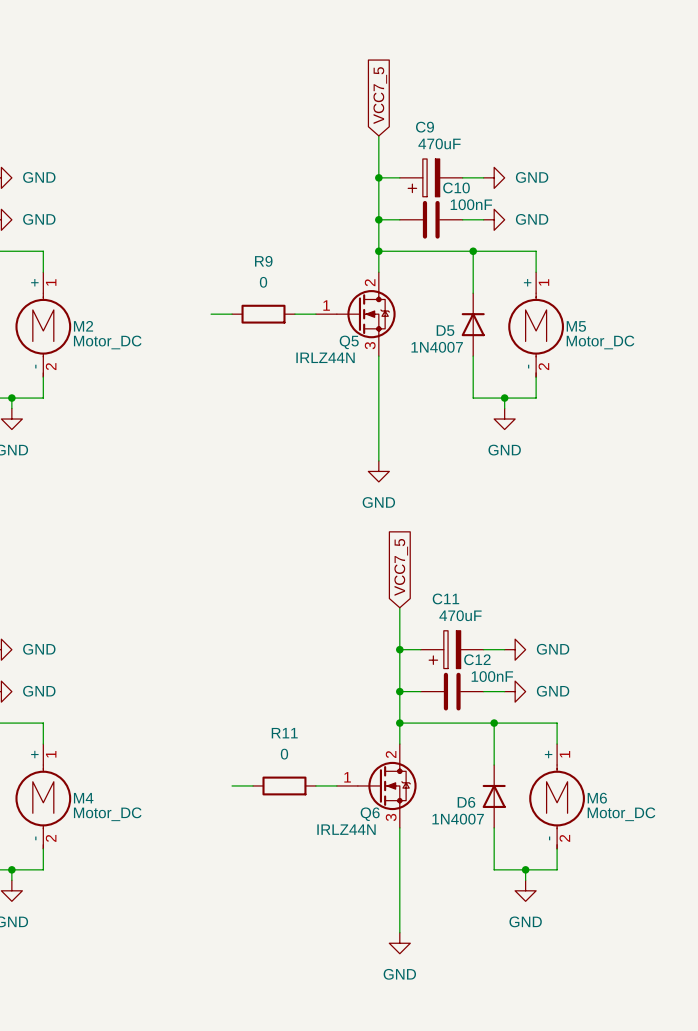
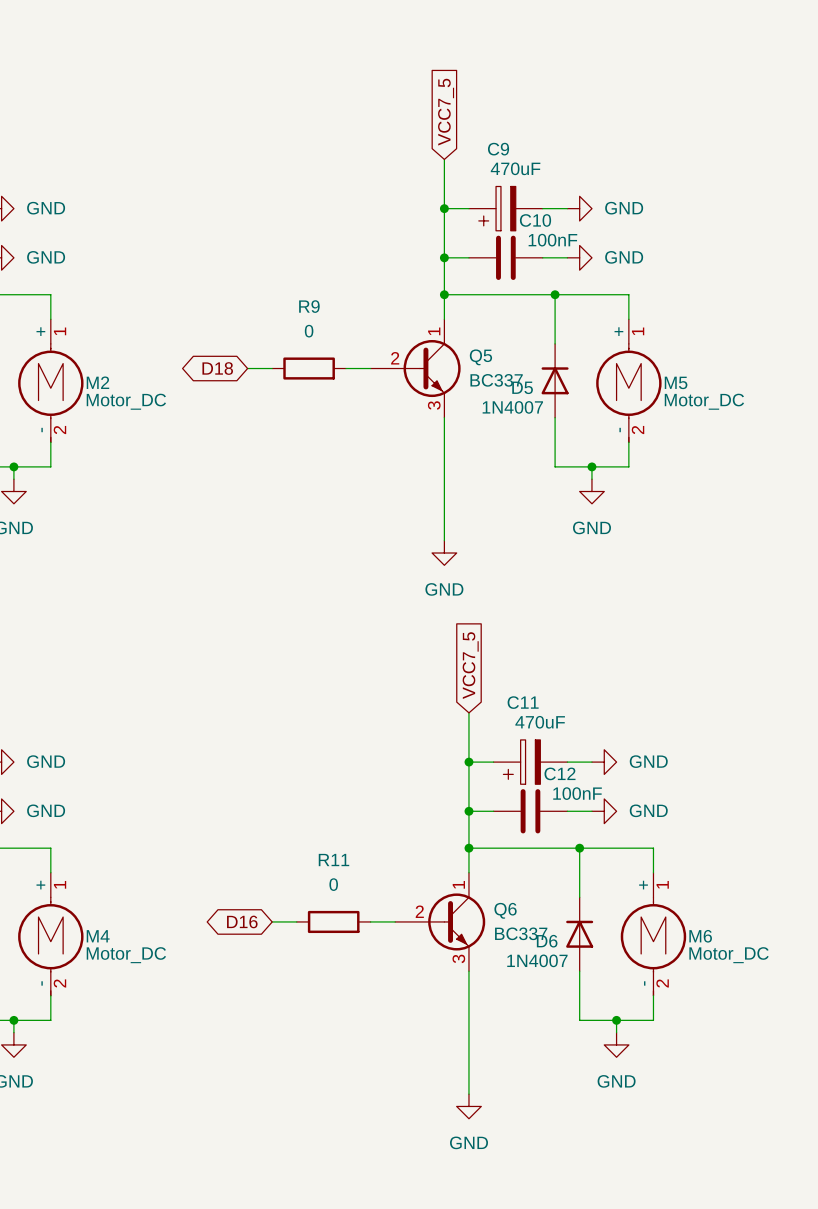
Q5 symbol: [315, 272, 396, 357] -> [370, 319, 461, 418]
global label: none -> D18 (217, 368)
Q5 name position: Q5 (349, 342) -> Q5 (480, 357)
Q5 value: IRLZ44N (325, 357) -> BC337 (496, 380)
Q6 symbol: [336, 744, 417, 828] -> [395, 872, 486, 972]
global label: none -> D16 (242, 921)
Q6 name position: Q6 (370, 814) -> Q6 (505, 910)
Q6 value: IRLZ44N (346, 829) -> BC337 (521, 933)

